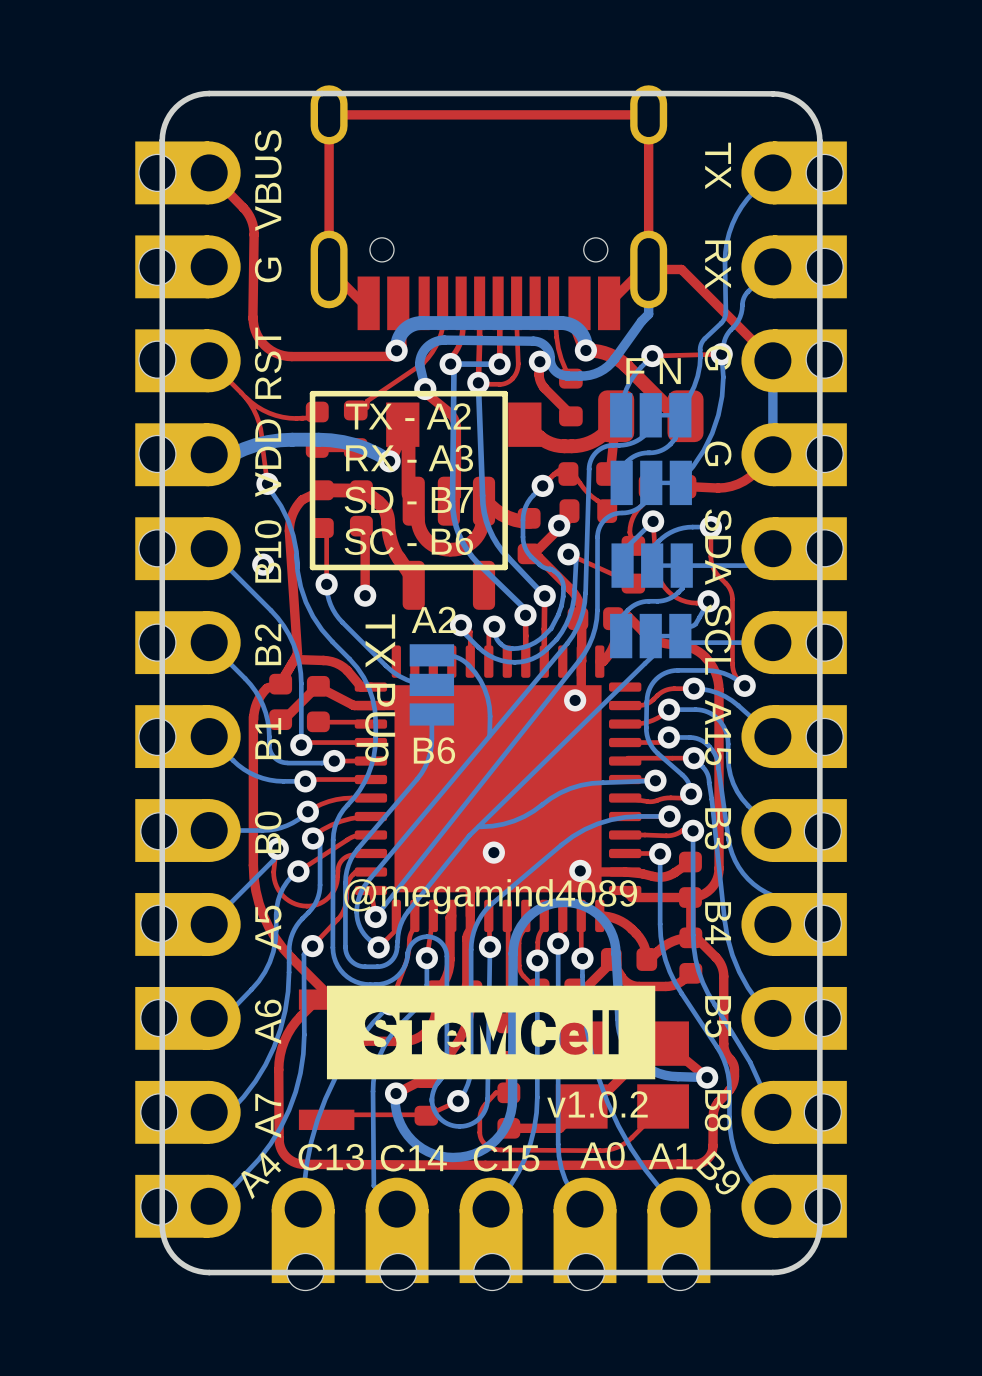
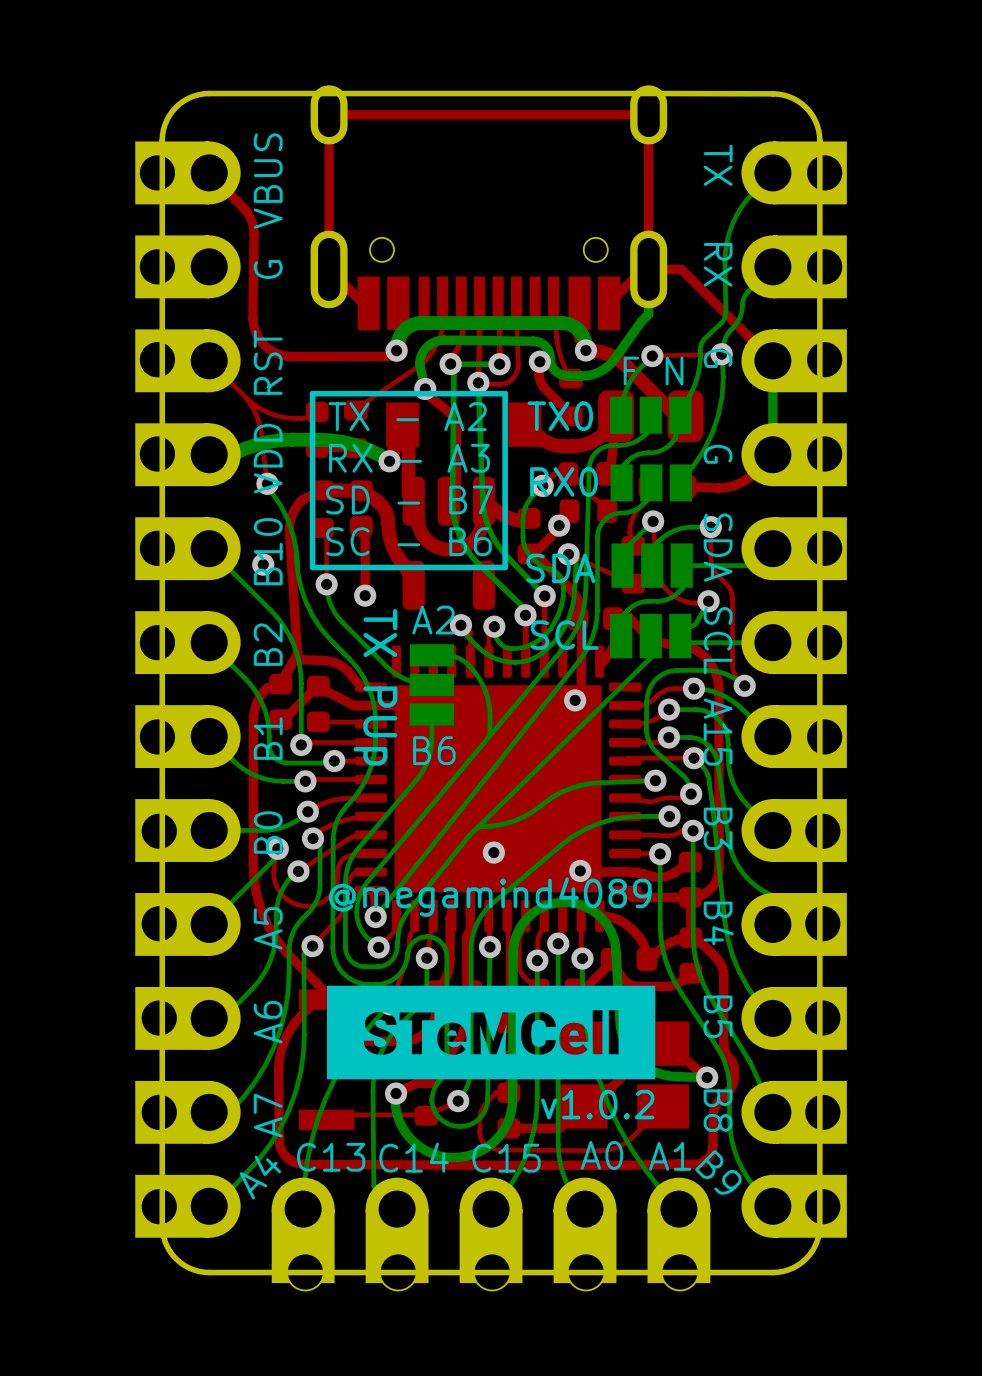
part footprint: [610, 393, 692, 438] -> [610, 396, 692, 434]
part value: none -> TX0 (560, 416)
part footprint: [610, 460, 692, 506] -> [610, 464, 692, 502]
part value: none -> RX0 (564, 481)
part footprint: [611, 543, 693, 588] -> [611, 543, 693, 588]
part value: none -> SDA (560, 568)
part footprint: [610, 613, 692, 659] -> [610, 613, 692, 659]
part value: none -> SCL (564, 635)

